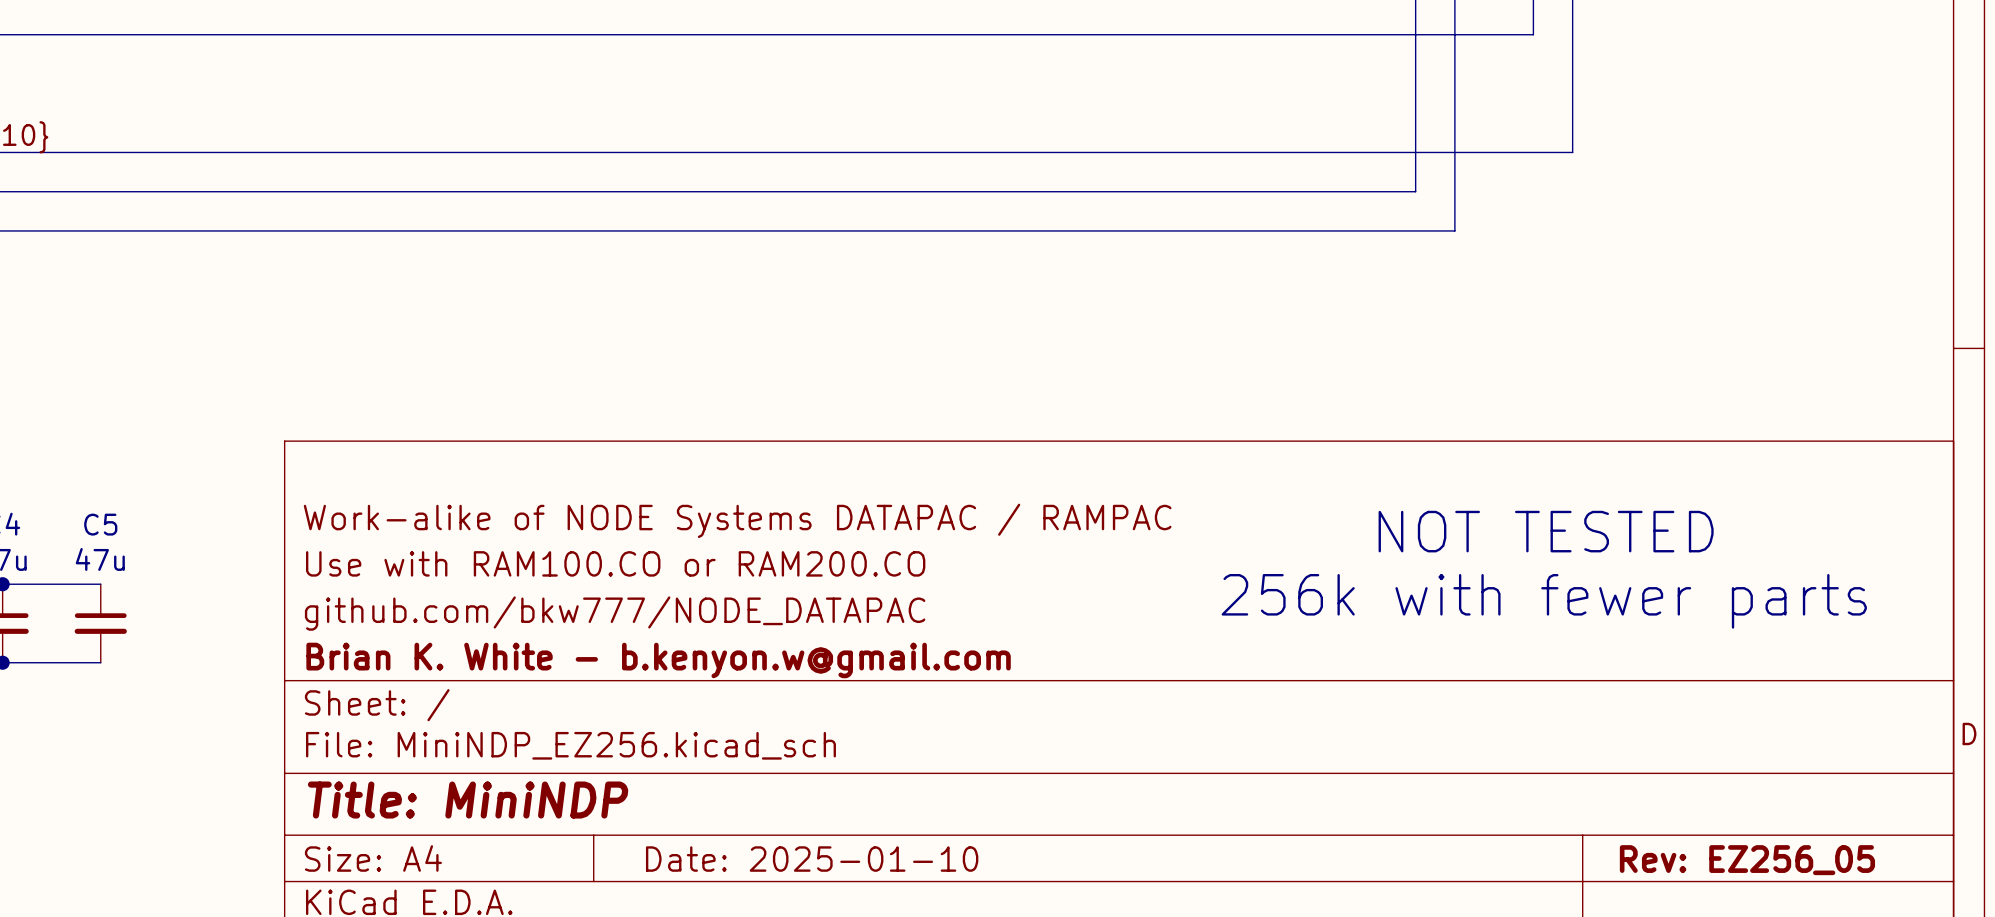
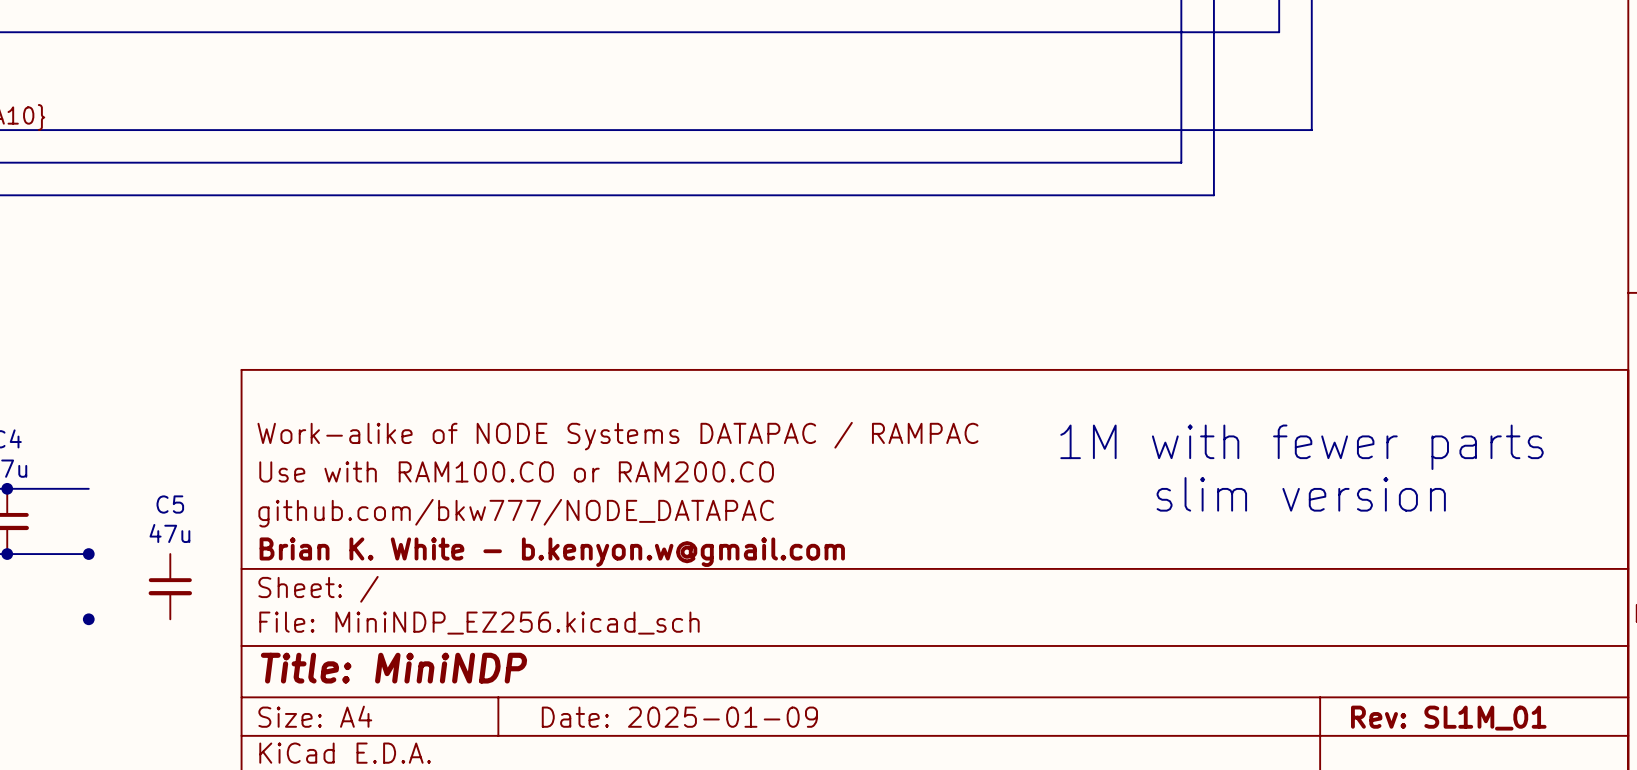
text: NOT TESTED (1546, 531) -> none
text: none -> slim version (1301, 494)
text: 256k with fewer parts (1544, 601) -> 1M with fewer parts (1302, 447)
C5 position: (100, 623) -> (170, 586)
junction: none -> (88, 554)
junction: none -> (88, 619)
title block: Date: 2025-01-10 (812, 859) -> Date: 2025-01-09 (679, 717)
title block: Rev: EZ256_05 (1747, 860) -> Rev: SL1M_01 (1448, 718)

